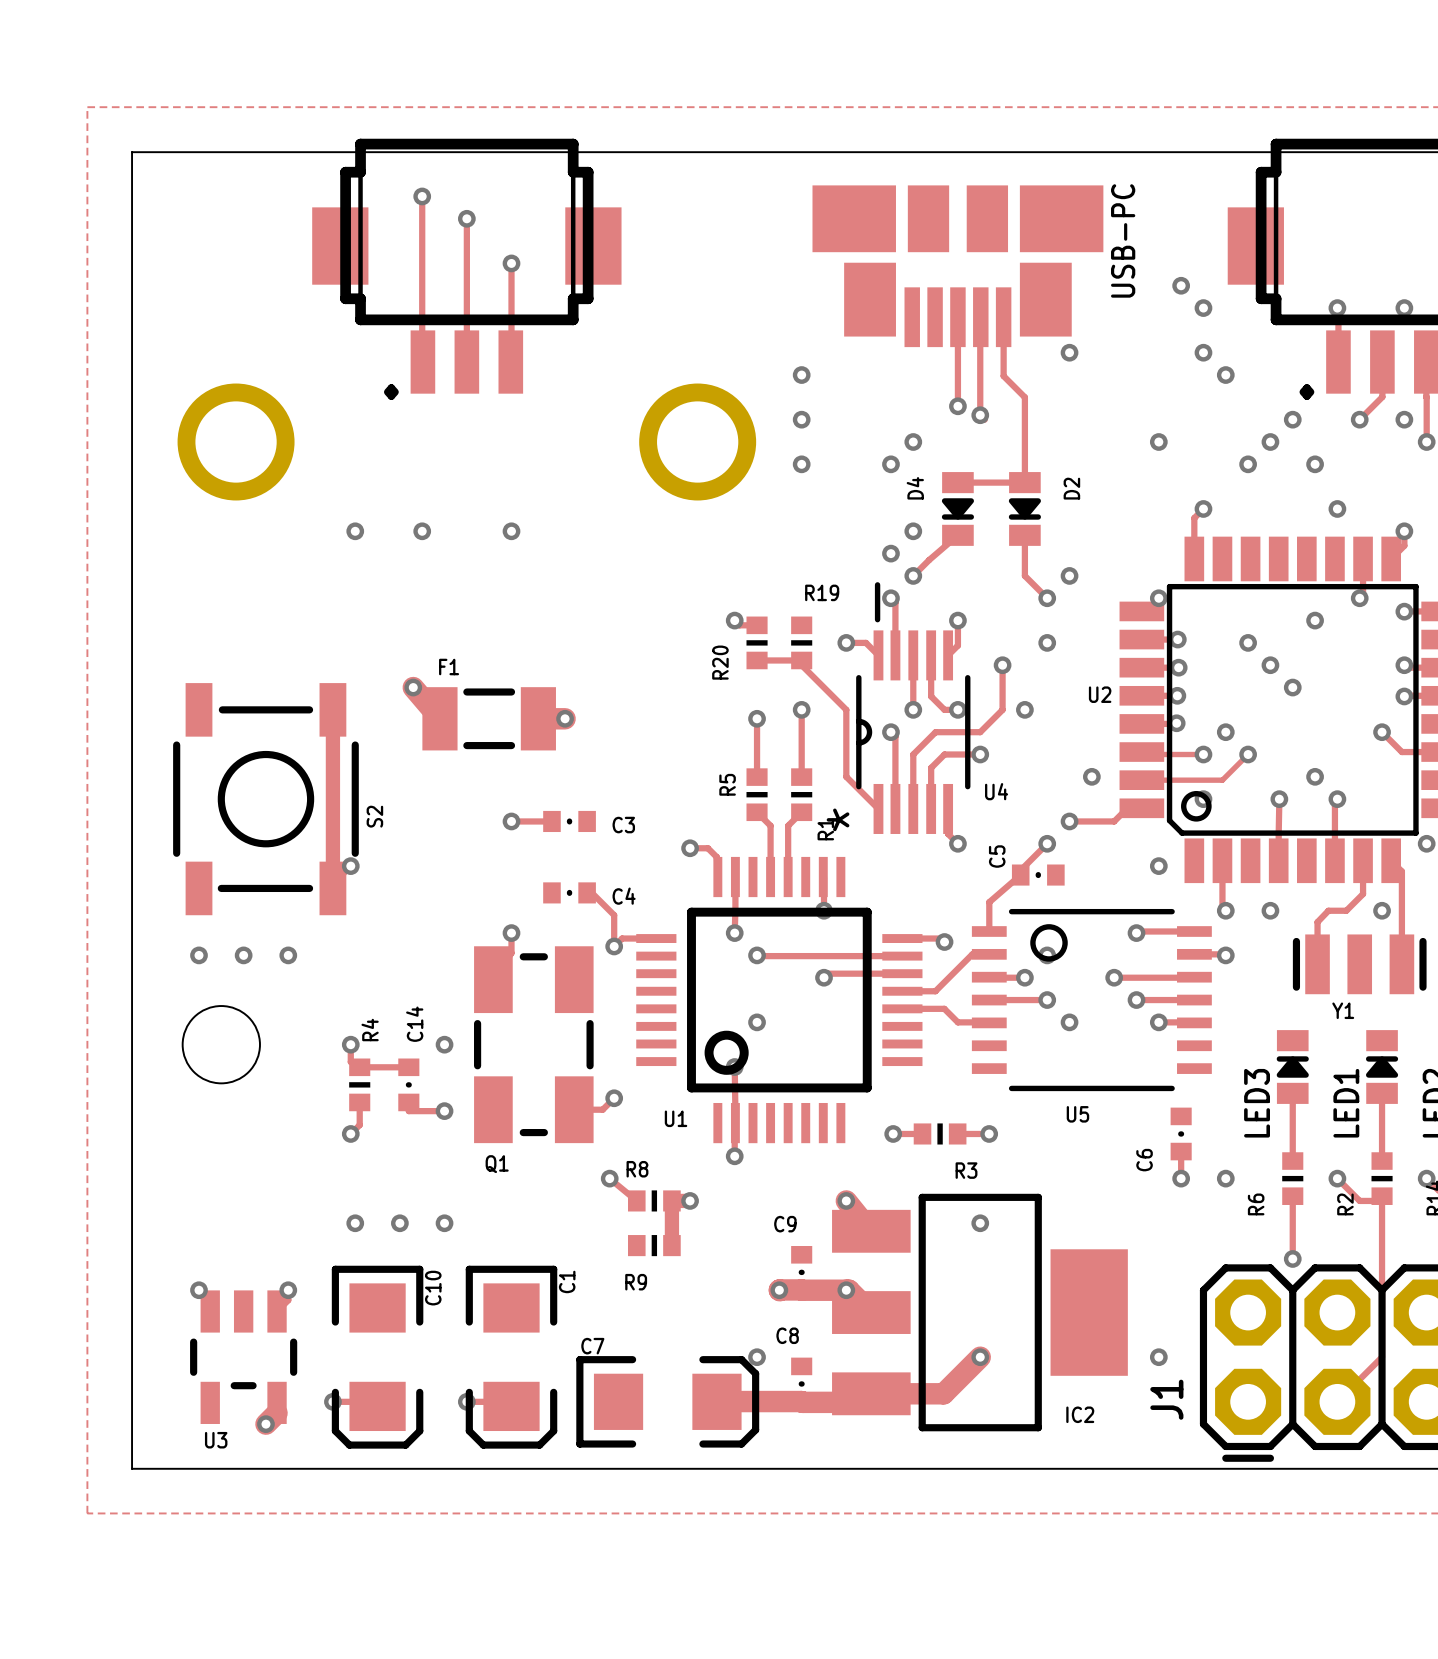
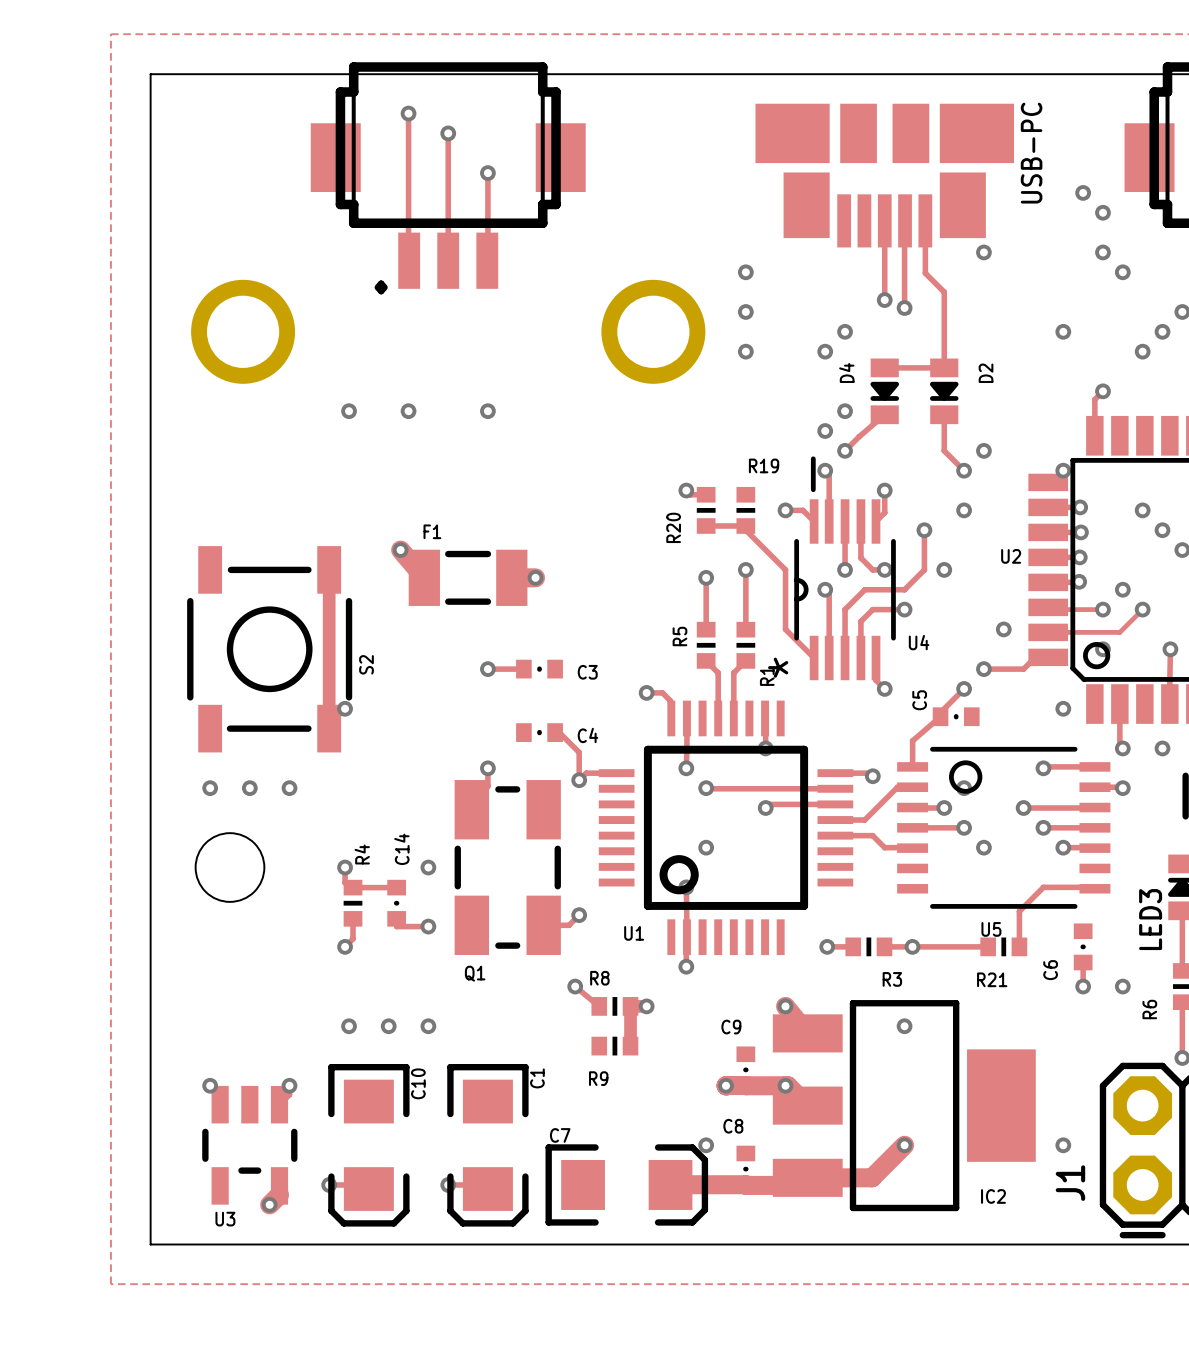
track: none -> (1094, 888) (1043, 887) (1019, 911) (1019, 946)
track: none -> (912, 946) (988, 946)
R21: none -> (1003, 946)

